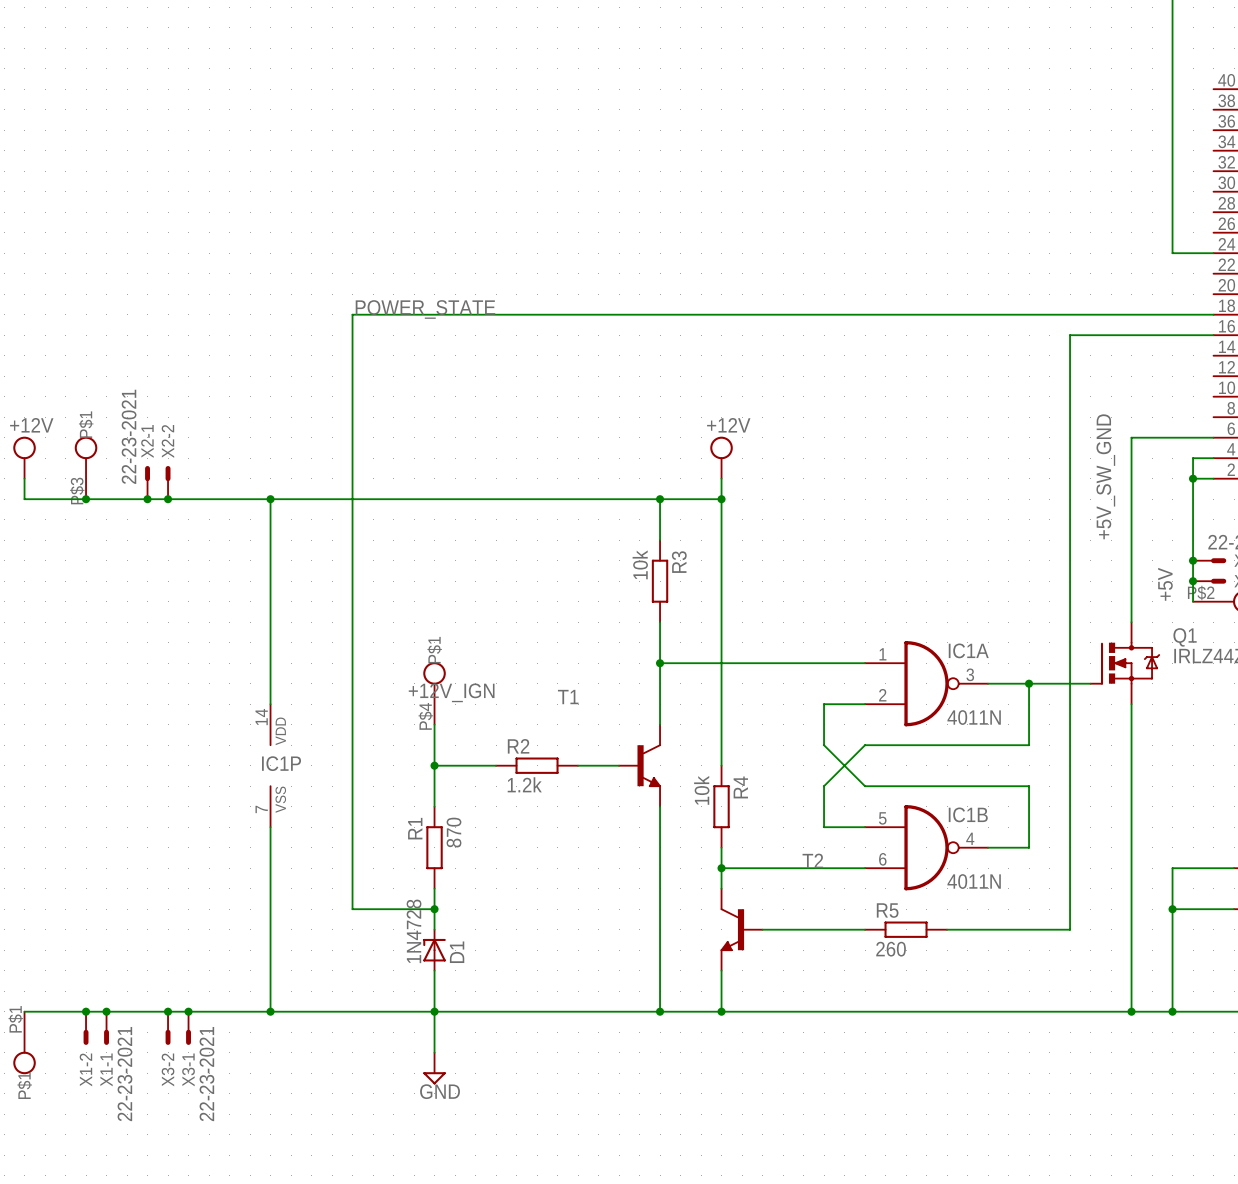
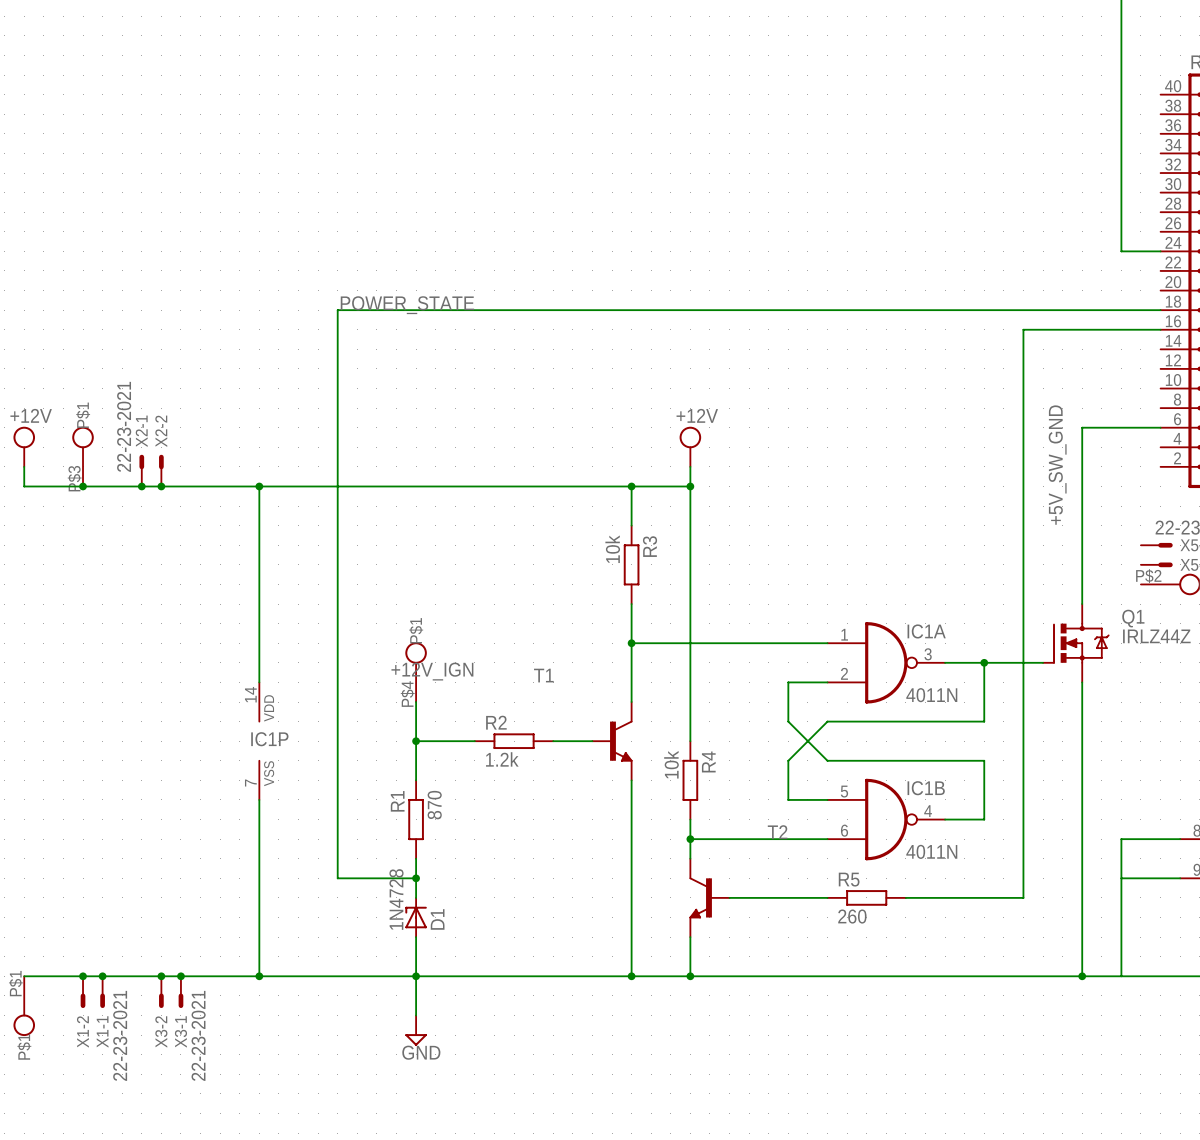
wire: (1213, 458) (1193, 458) (1193, 601) -> none
wire: (1193, 478) (1213, 478) -> none
junction: (1193, 478) -> none
junction: (1193, 560) -> none
junction: (1193, 581) -> none
label: +5V (1165, 584) -> none
junction: (1172, 909) -> none
junction: (1172, 1011) -> none

